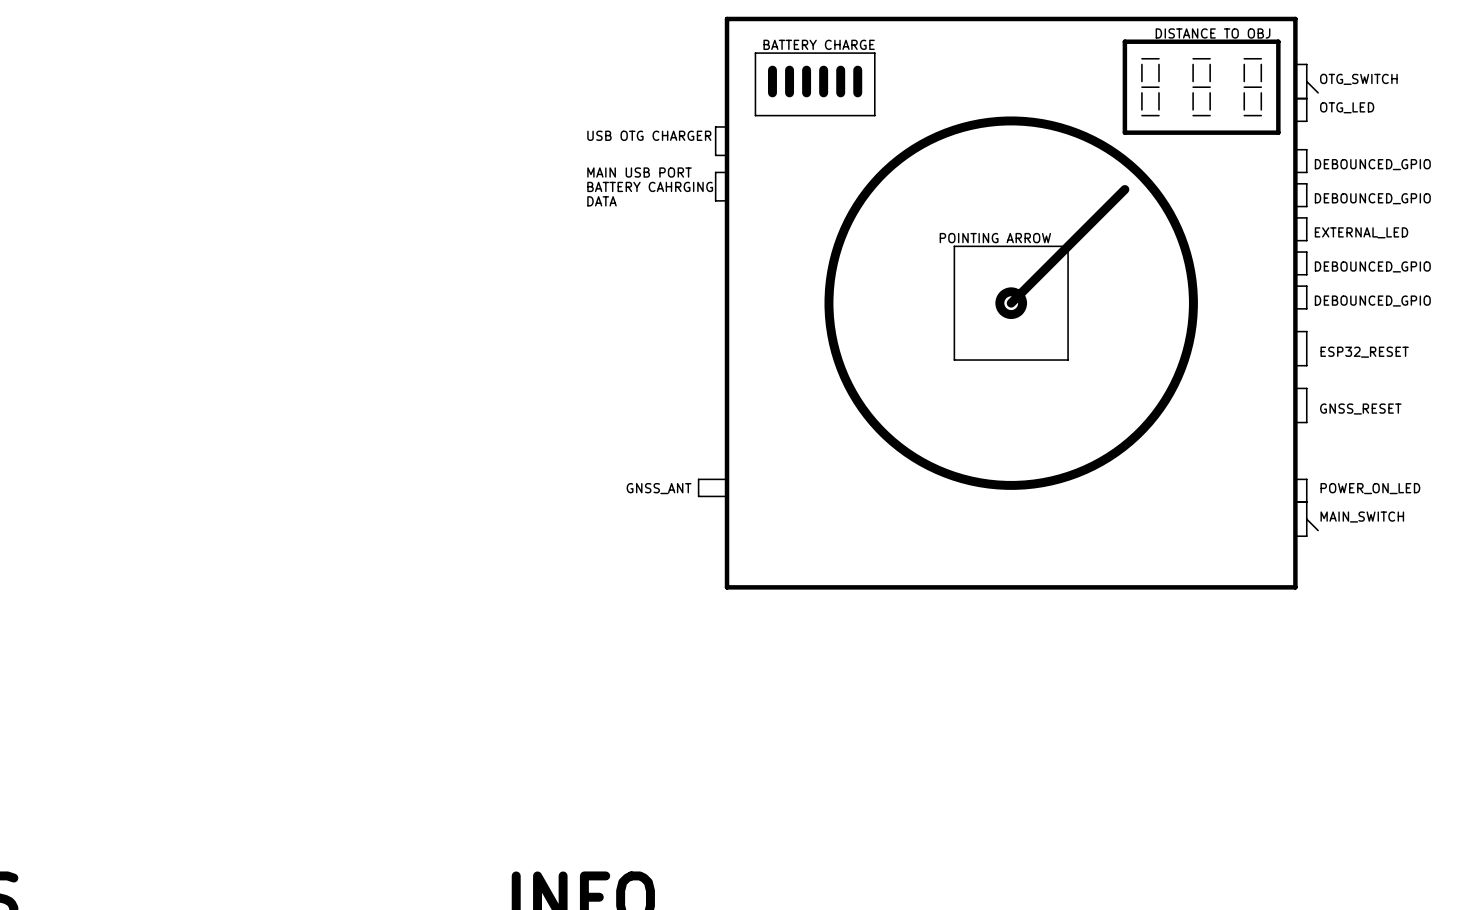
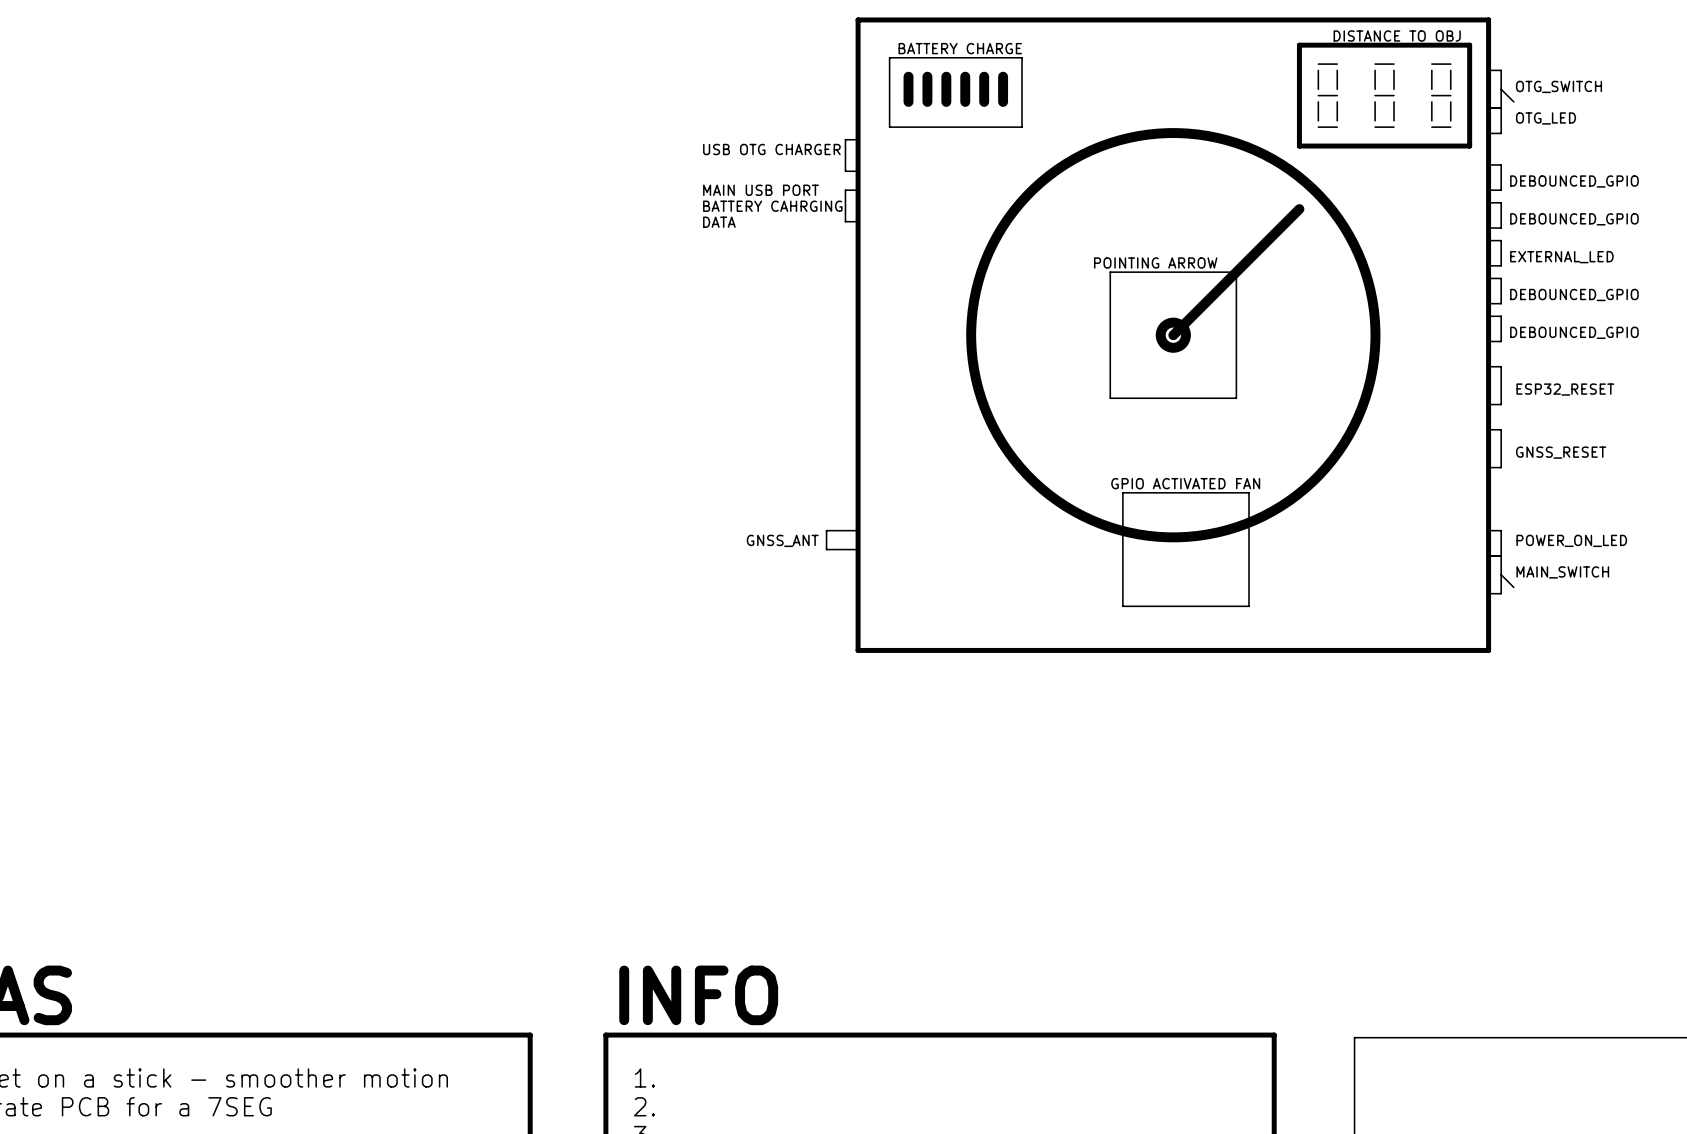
text: none -> GPIO ACTIVATED FAN (1185, 483)
line: none -> (1122, 492) (1248, 492) (1248, 606) (1122, 606) (1122, 492)

